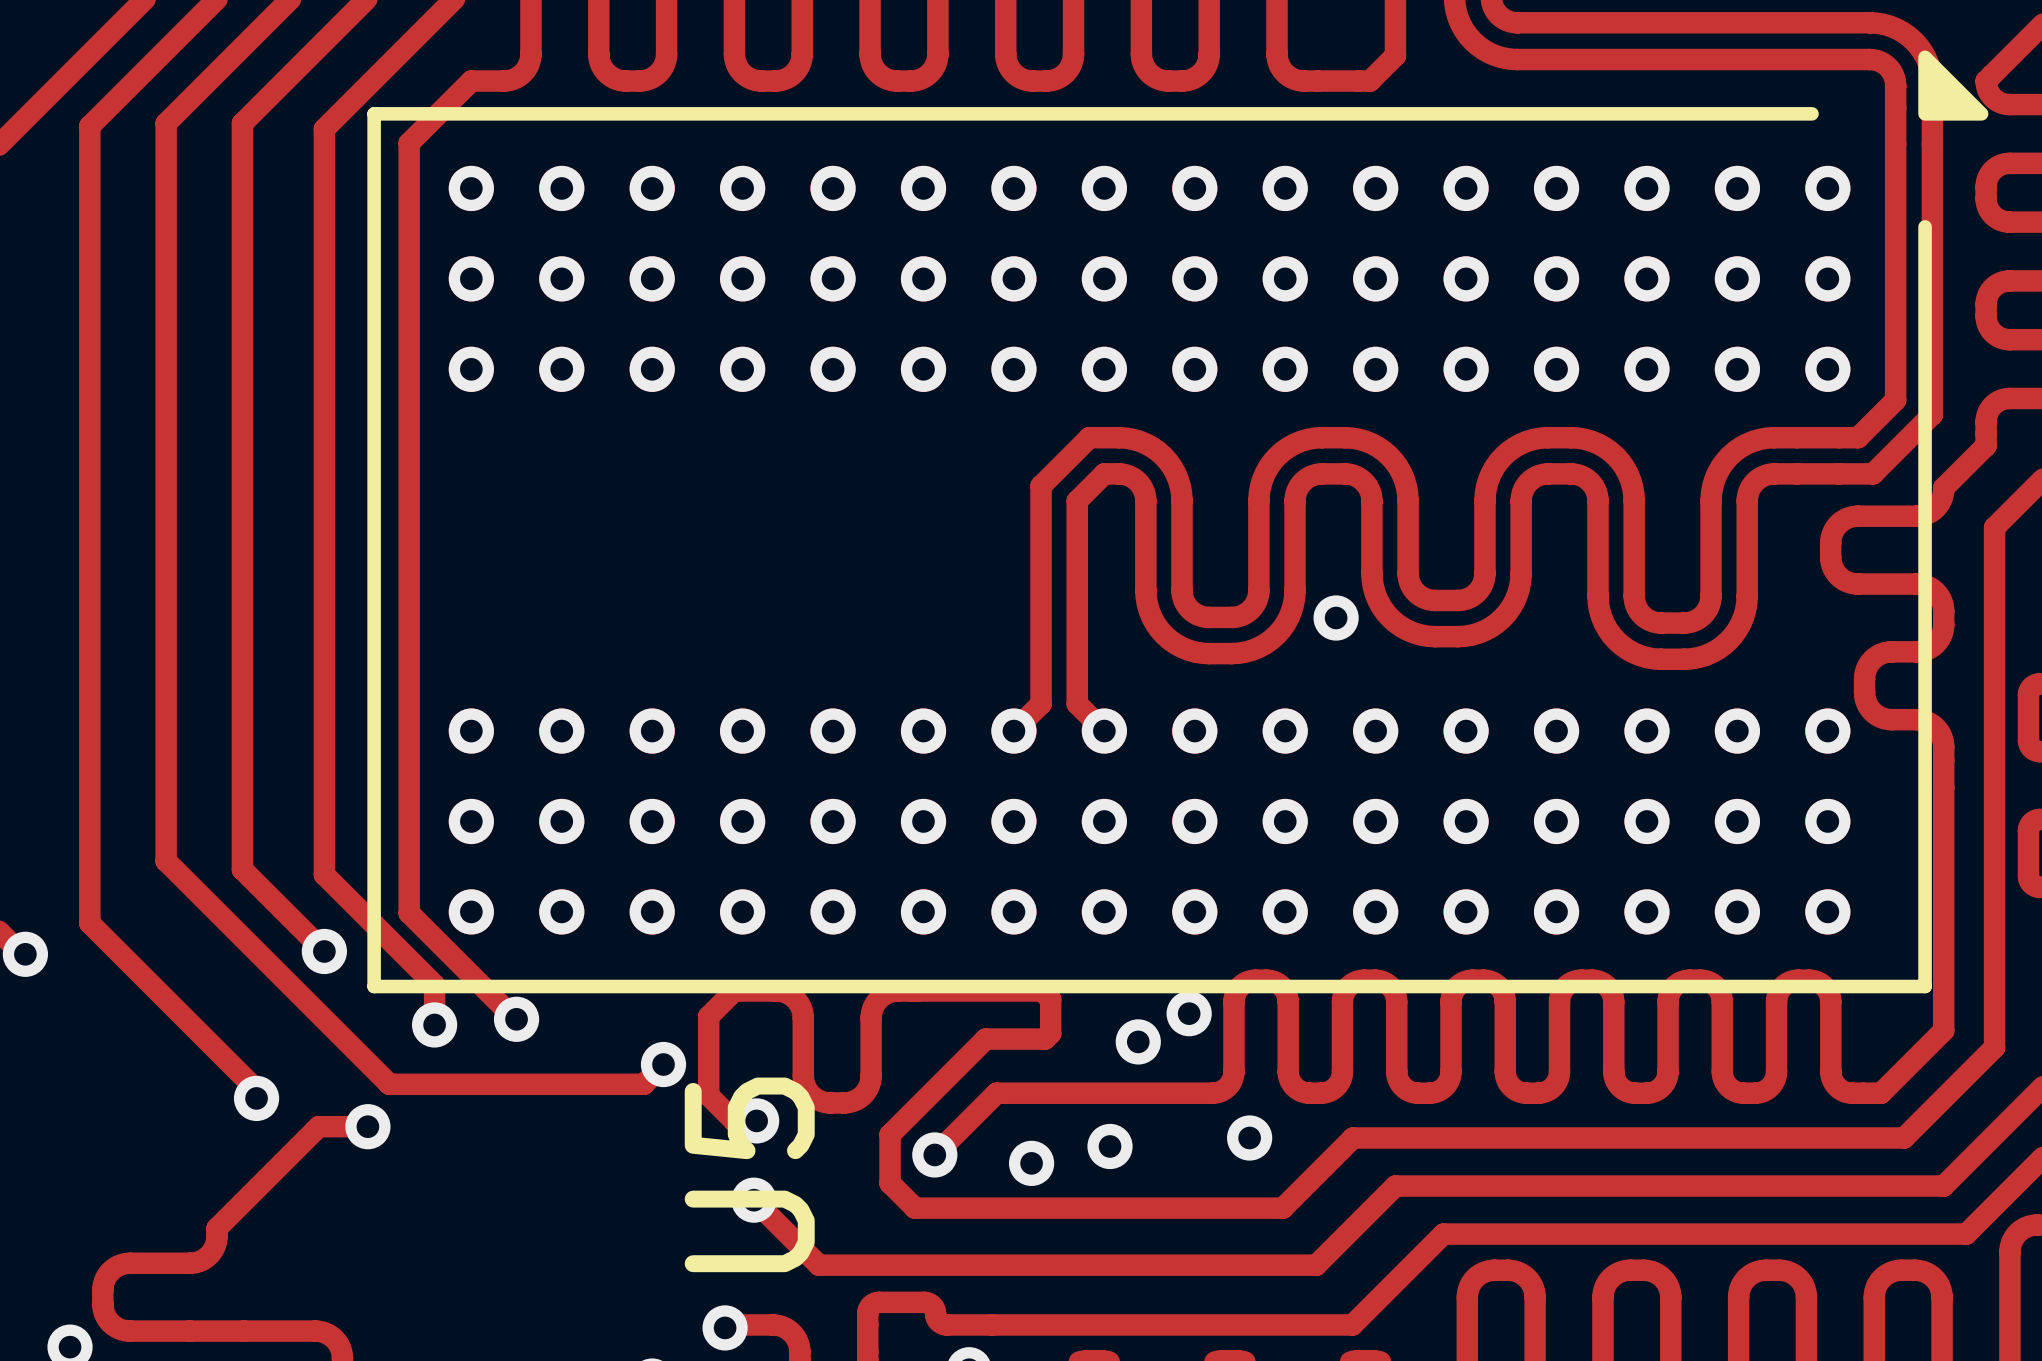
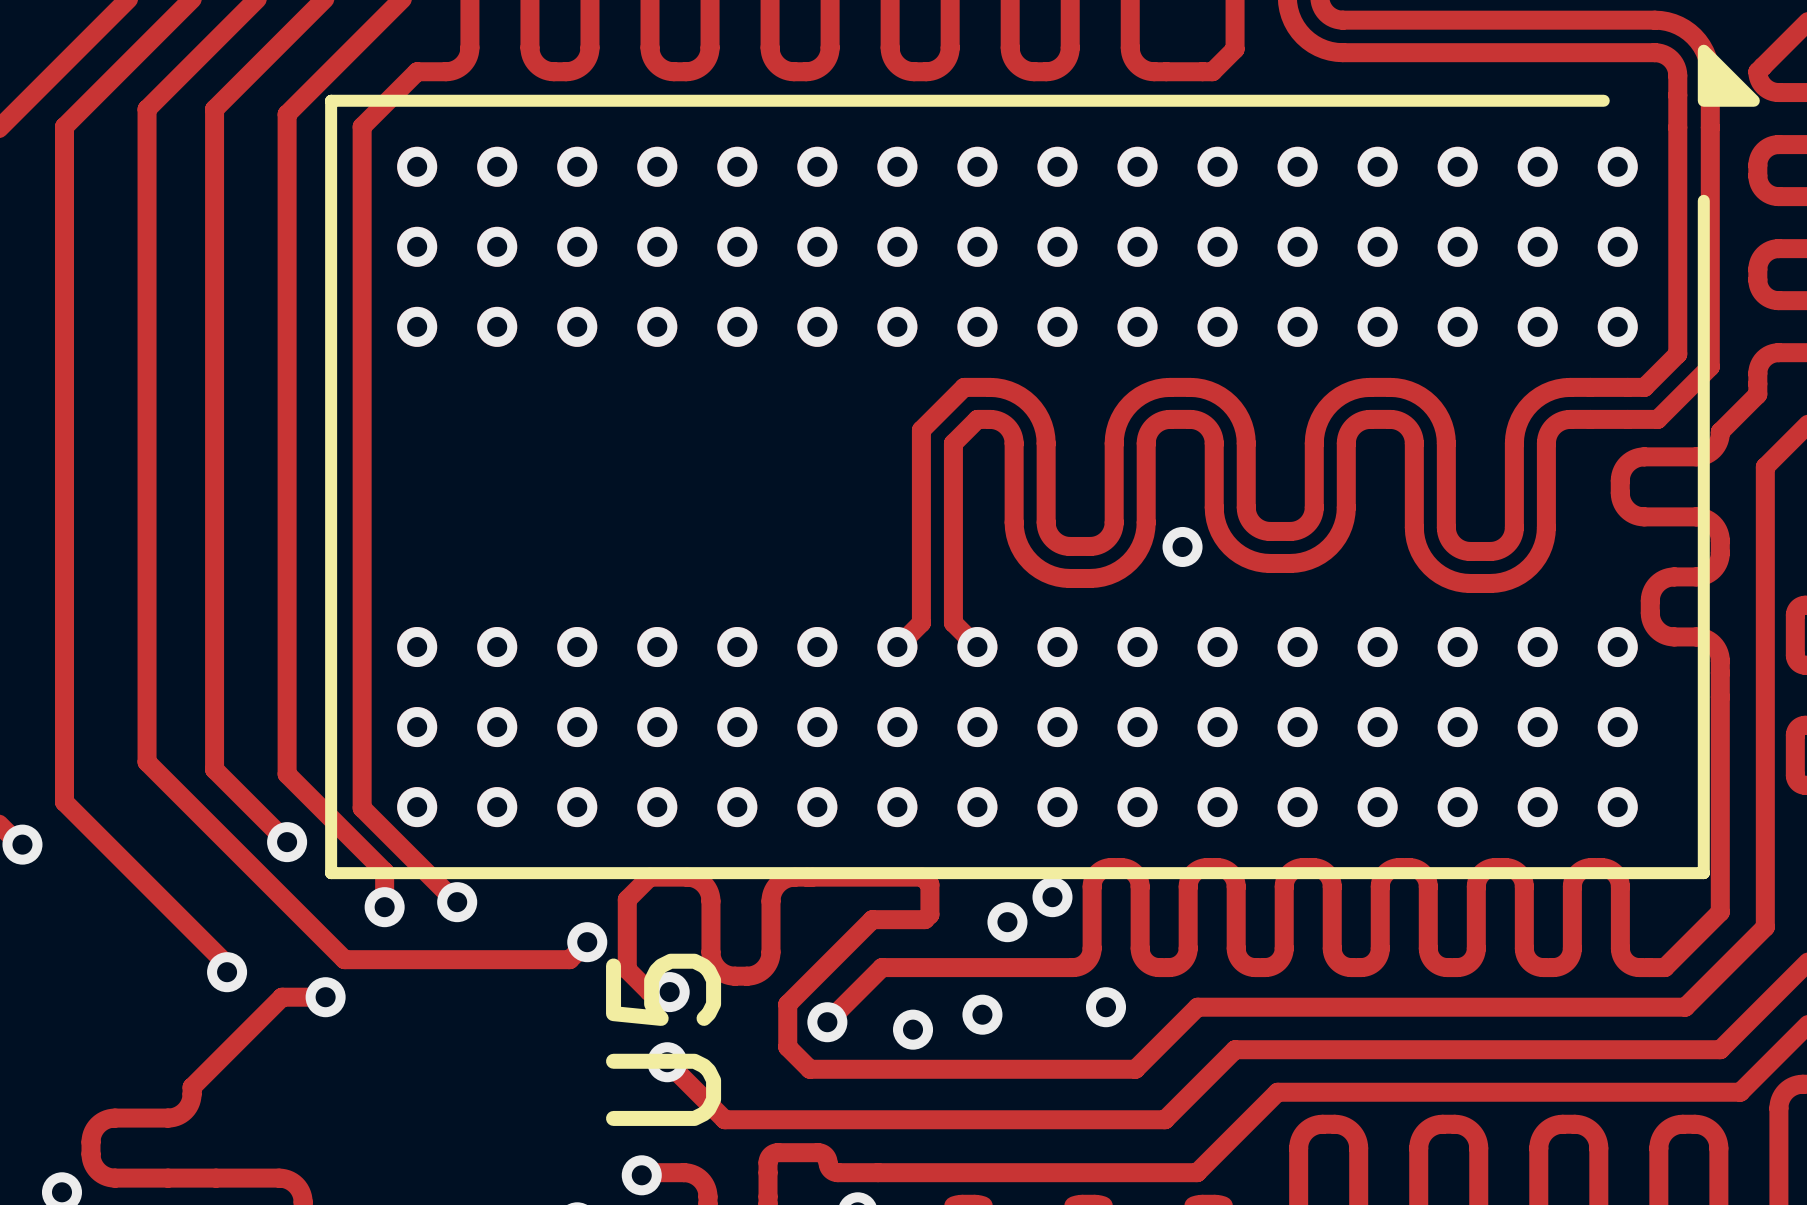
track: (89, 126) (89, 923) -> (79, 111) (64, 126) (64, 802) (79, 817)

